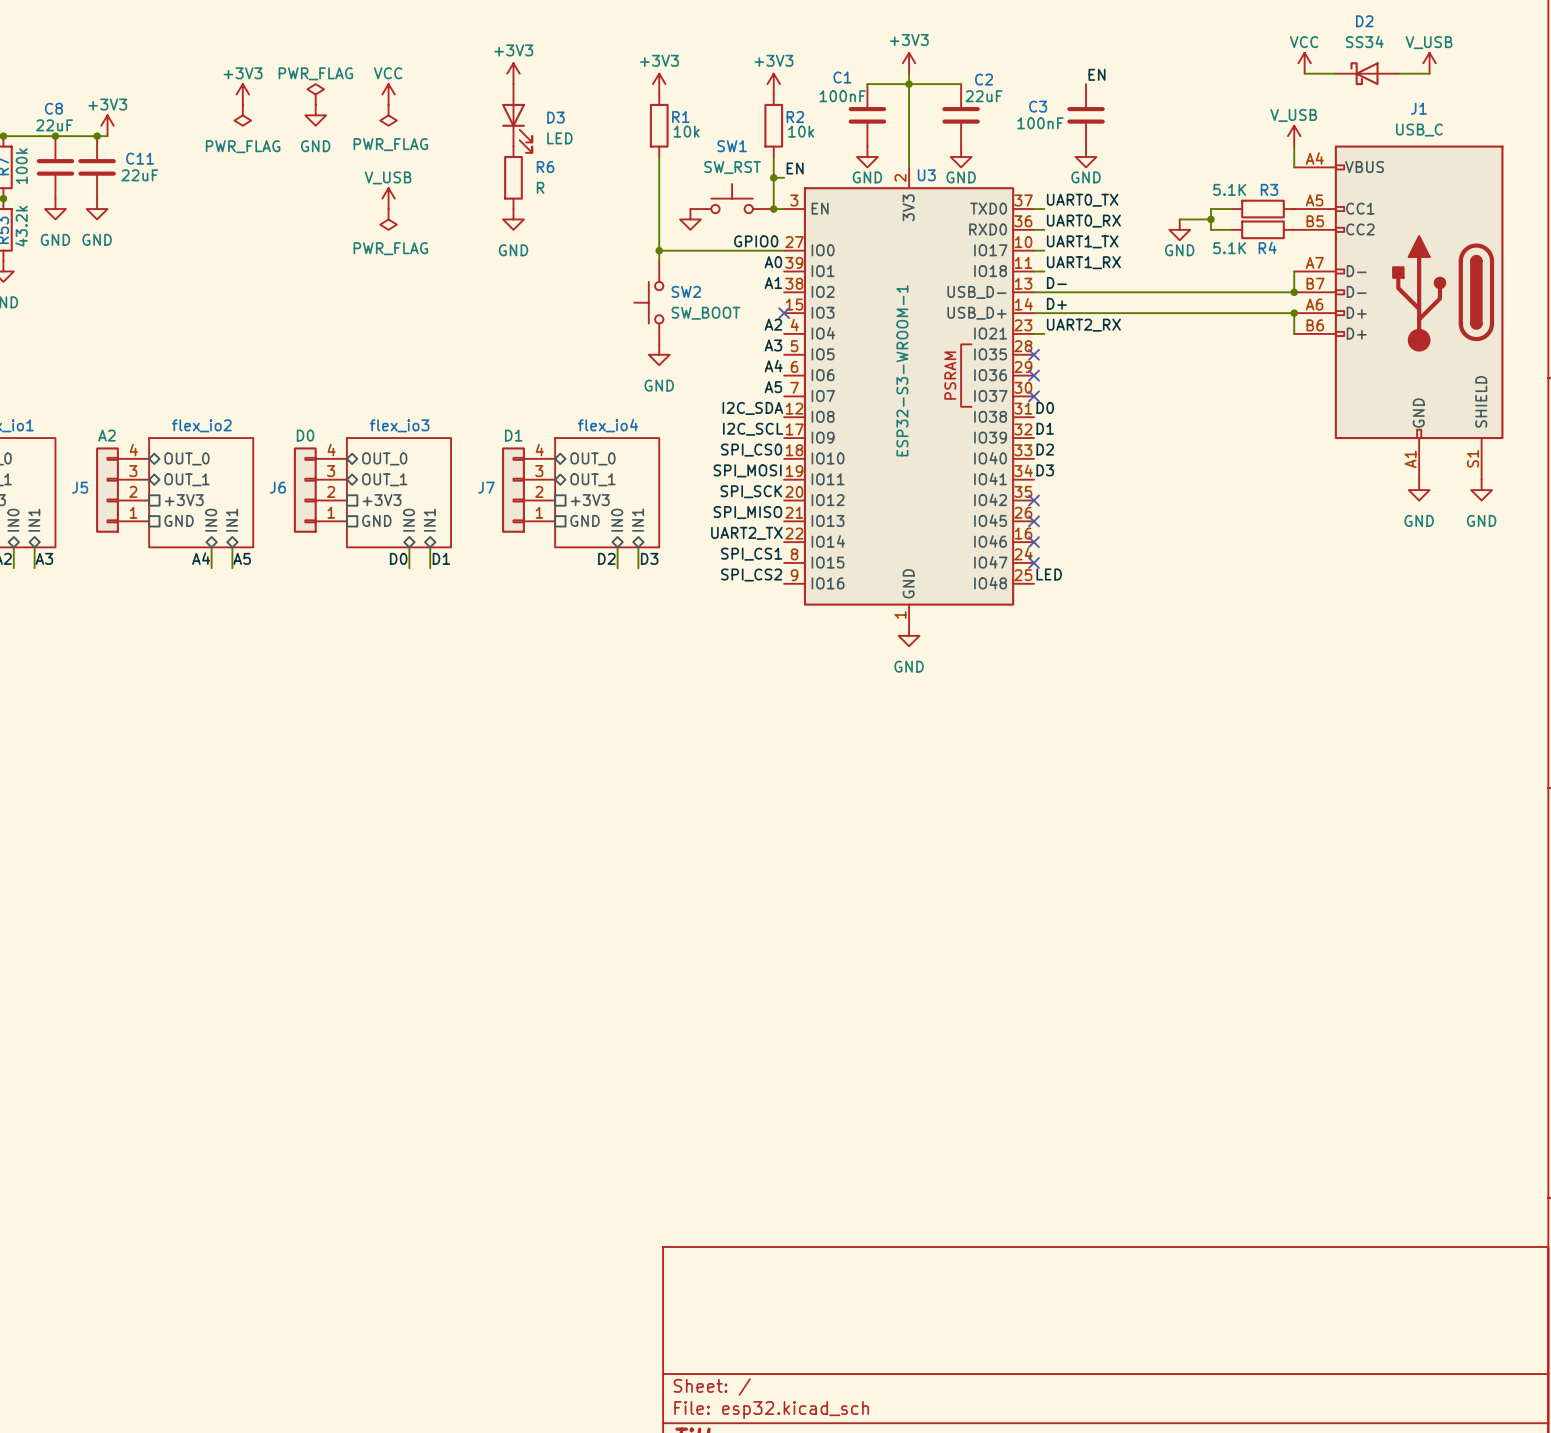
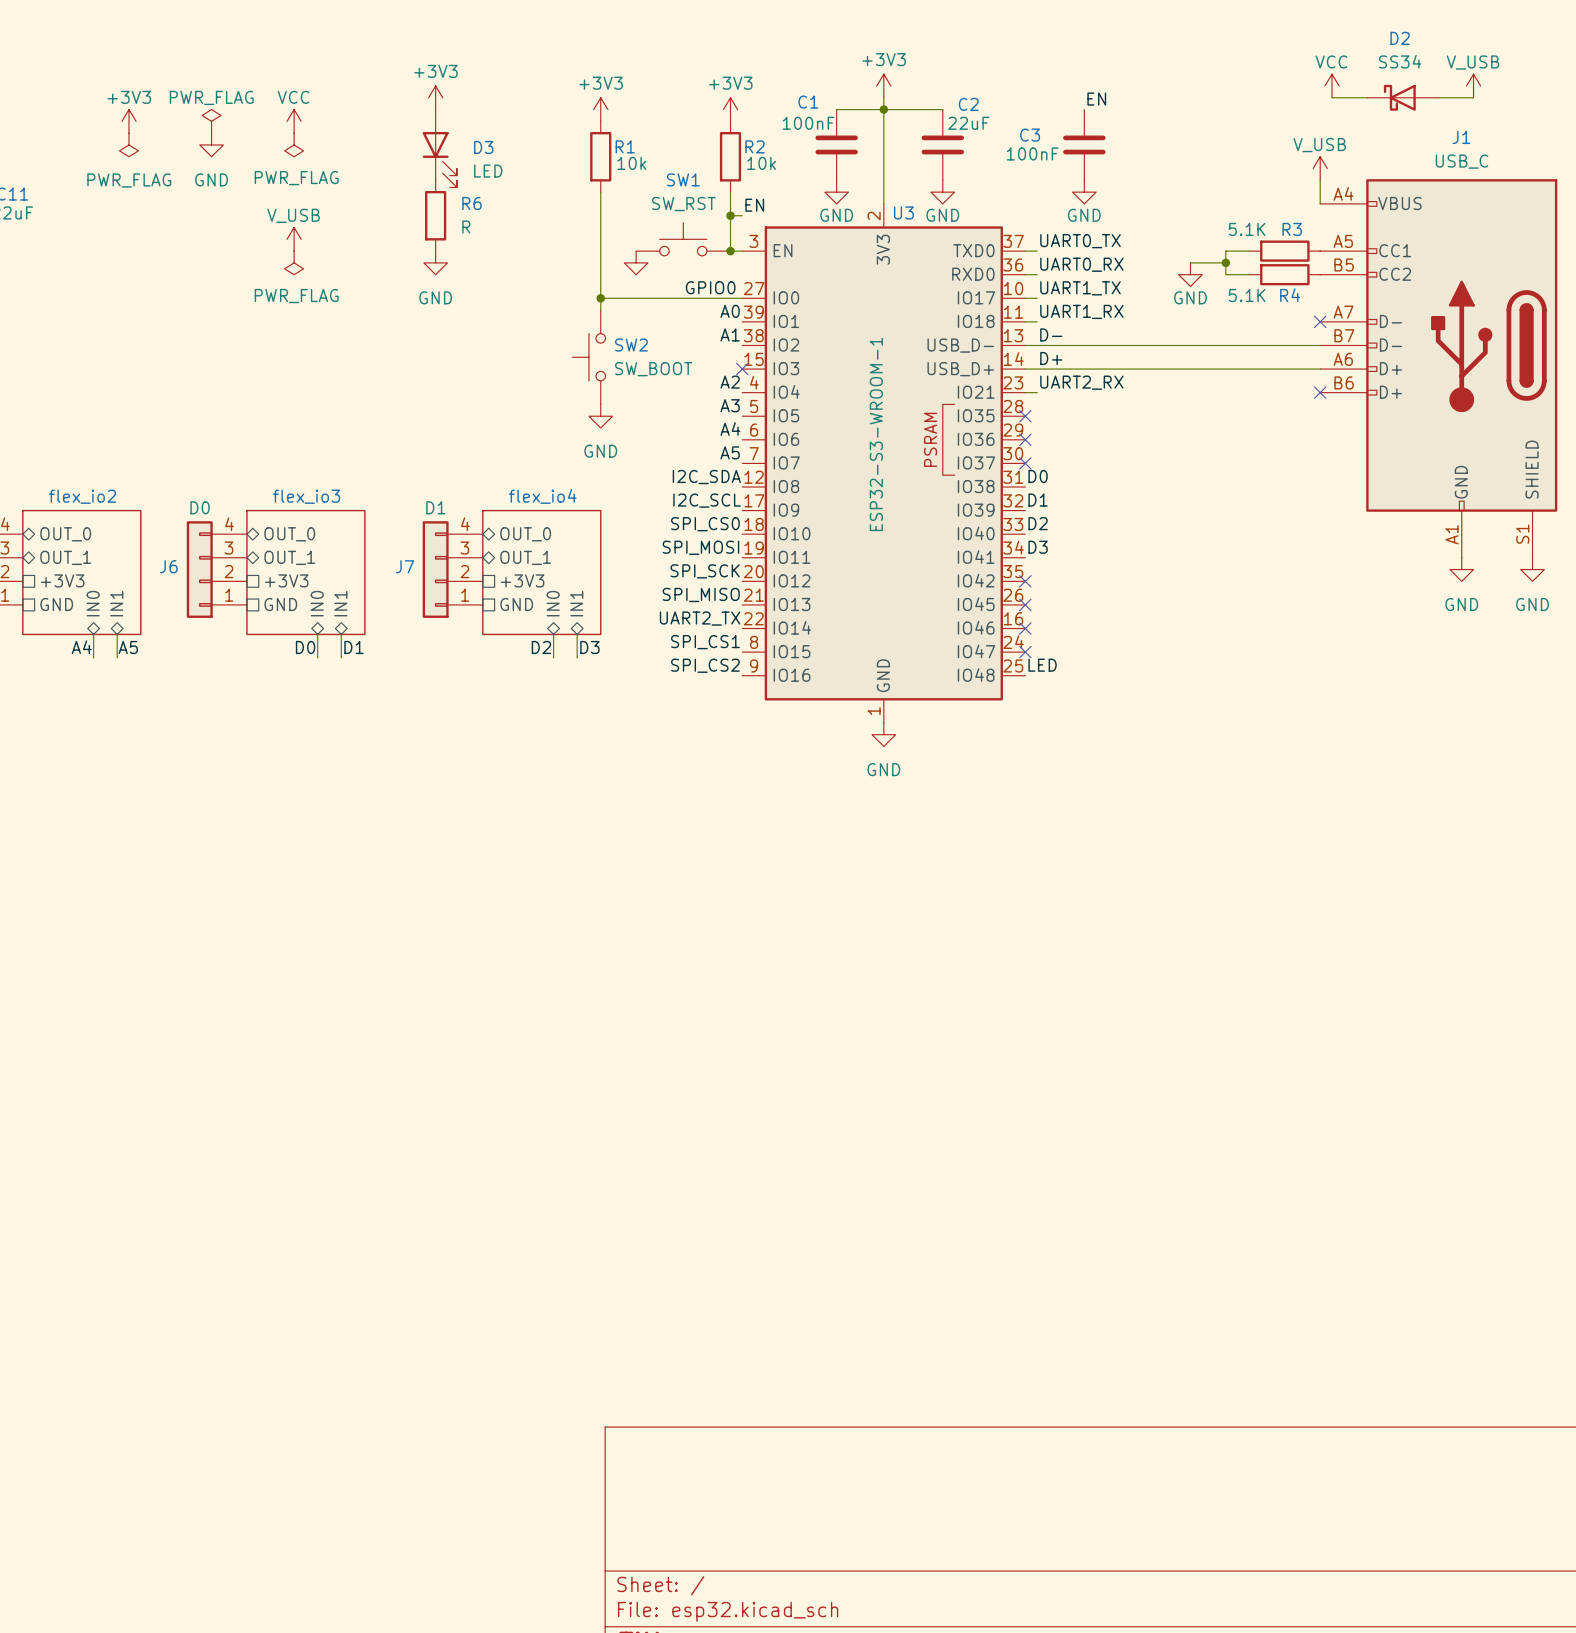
wire: (1294, 271) (1294, 292) -> none
no-connect mark: none -> (1320, 321)
junction: (1294, 292) -> none
wire: (1294, 313) (1294, 333) -> none
junction: (1294, 313) -> none
no-connect mark: none -> (1320, 392)

